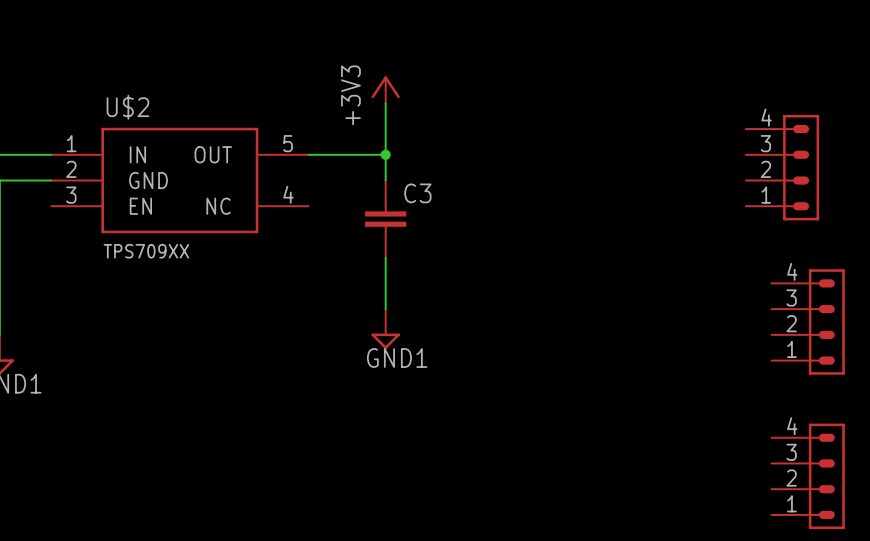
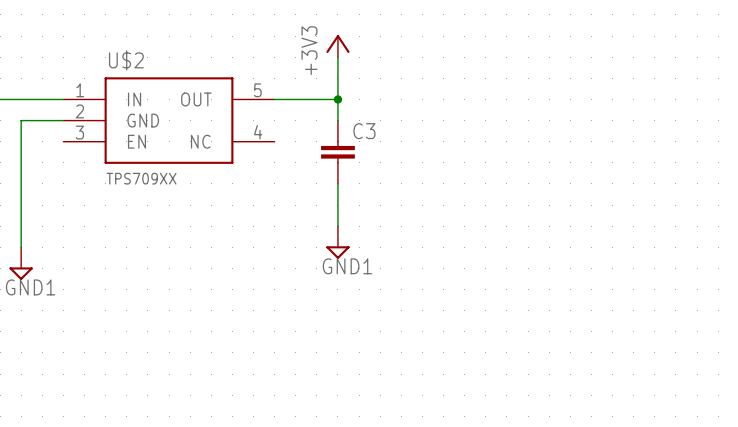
part: (782, 167) -> none
part: (808, 321) -> none
part: (808, 476) -> none

